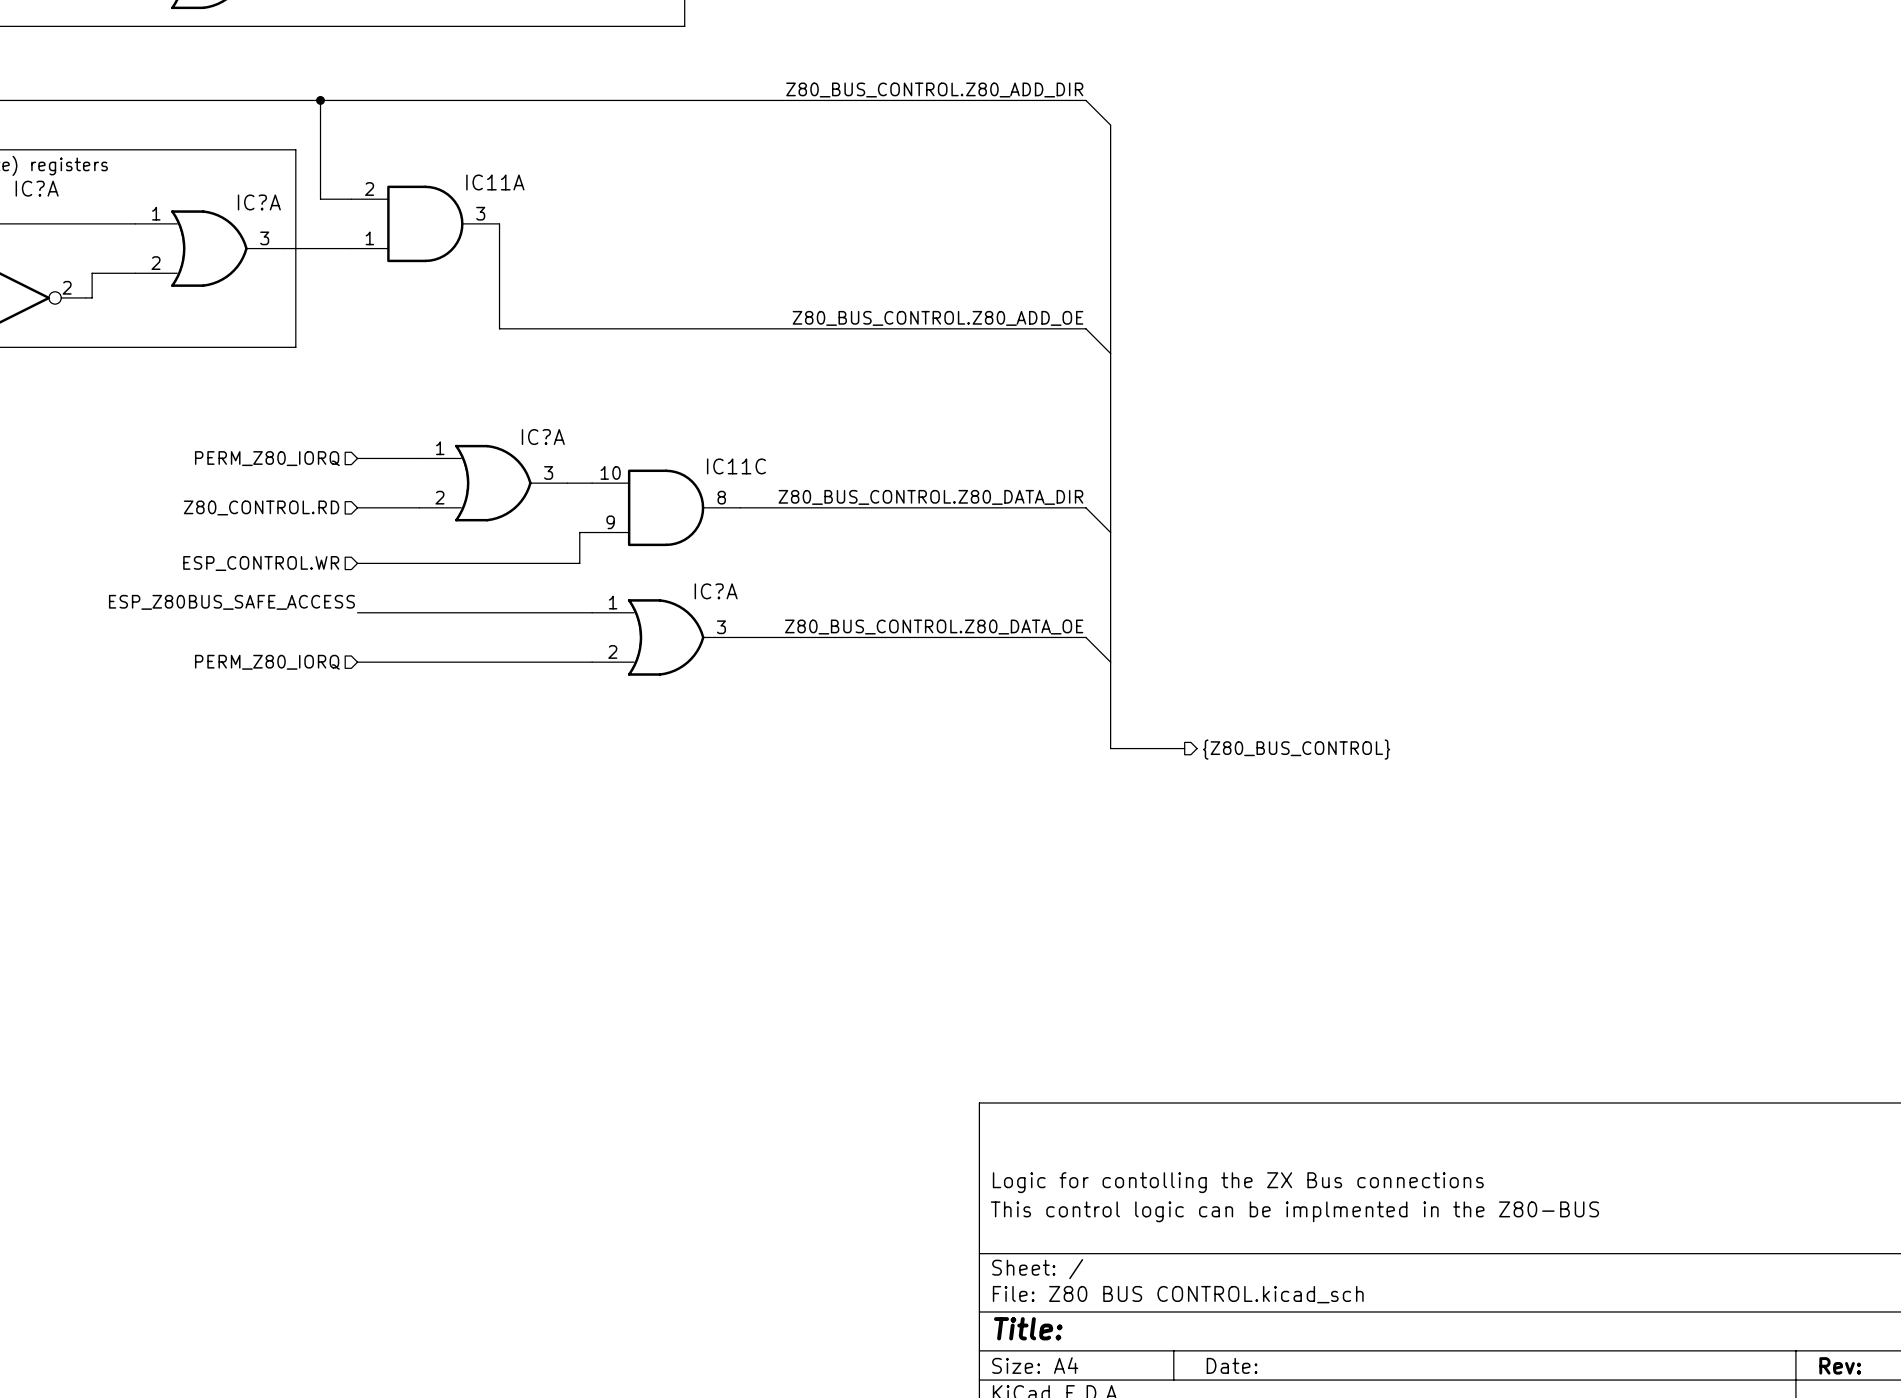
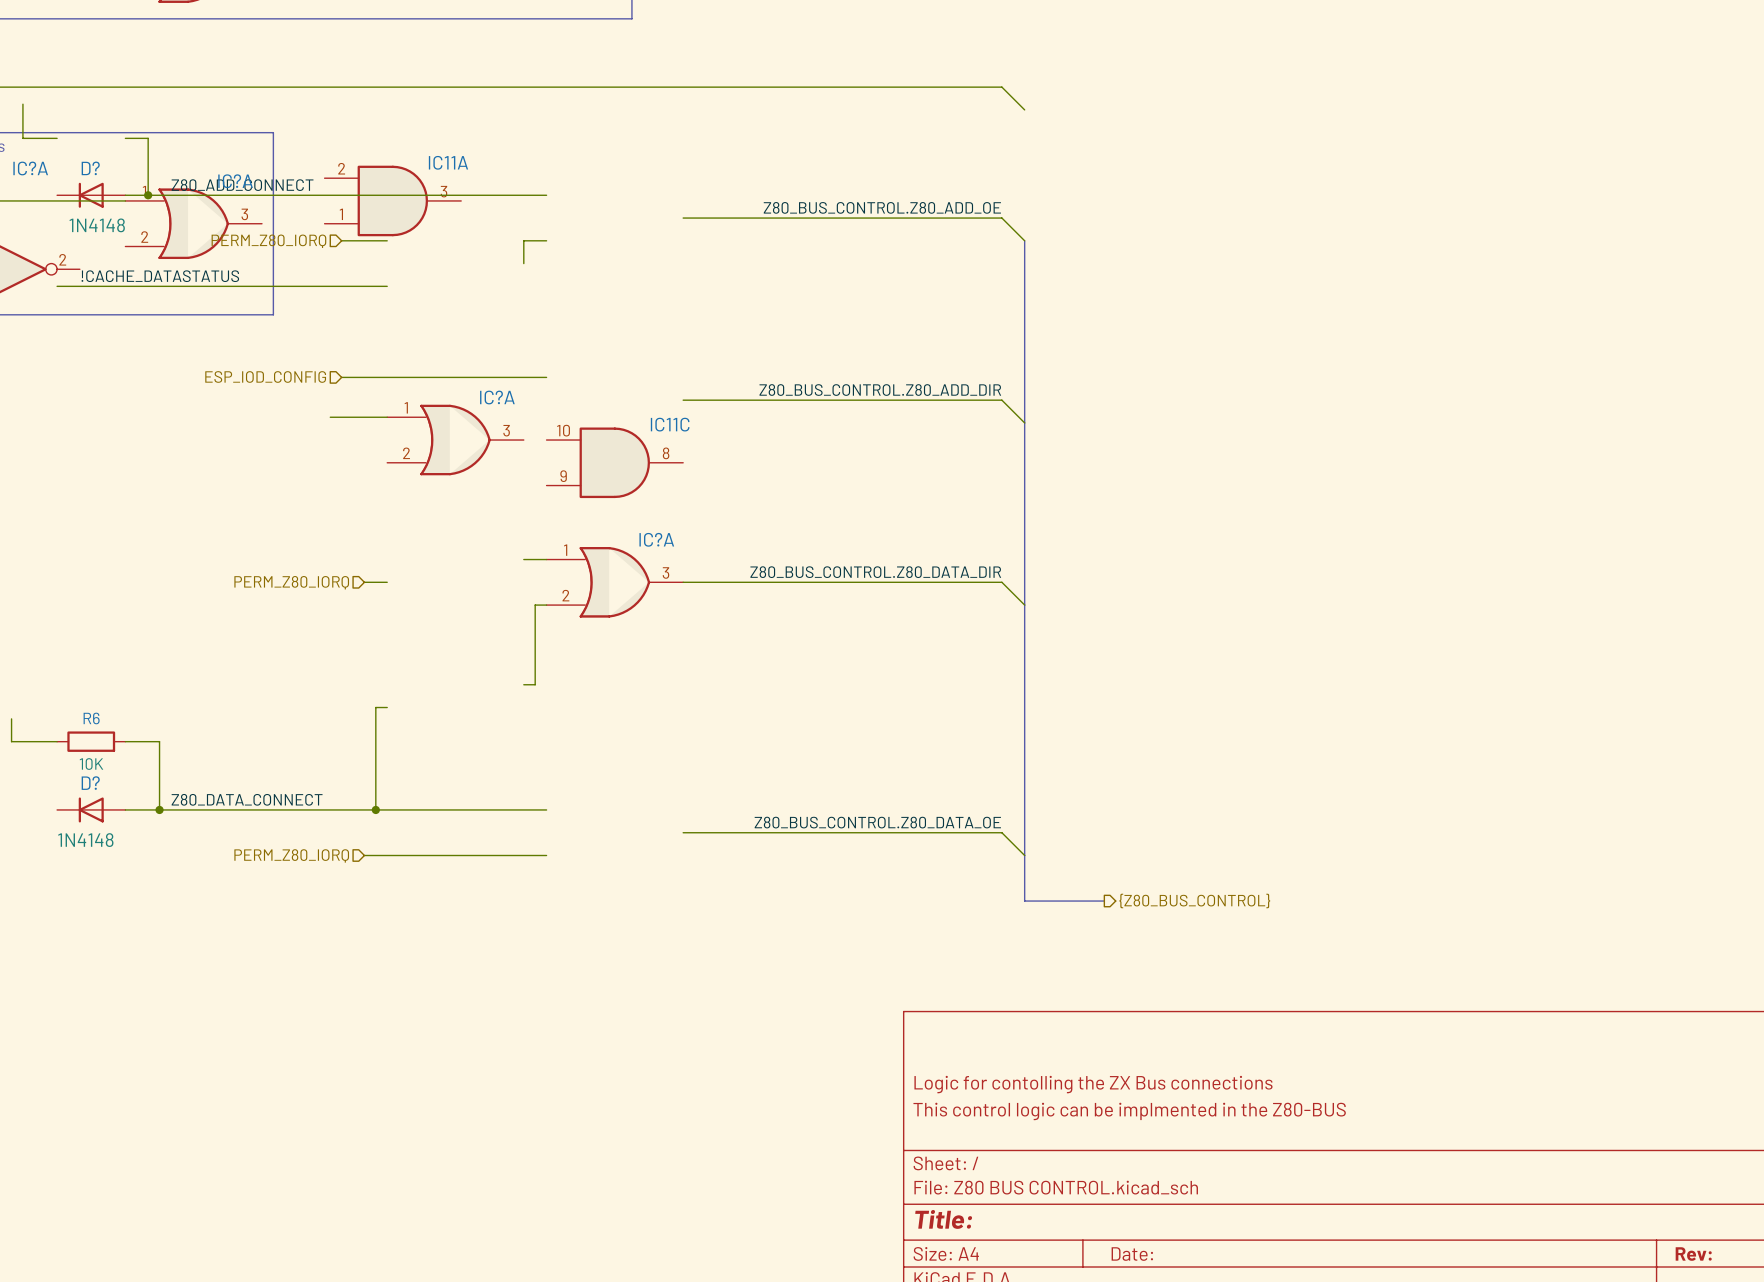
label: Z80_BUS_CONTROL.Z80_ADD_DIR (934, 90) -> none
wire: (320, 100) (320, 199) (351, 199) -> none
junction: (320, 100) -> none
wire: none -> (22, 104) (22, 138) (57, 138)
bus: (1110, 125) (1110, 267) -> none
wire: none -> (125, 138) (148, 138) (148, 195)
label: none -> Z80_ADD_CONNECT (242, 185)
D?: none -> 1N4148 (91, 195)
wire: none -> (125, 195) (546, 195)
junction: none -> (148, 195)
wire: (499, 223) (499, 328) (1085, 328) (1110, 353) -> none
wire: none -> (683, 218) (1001, 218) (1024, 240)
wire: (283, 248) (351, 248) -> none
hierarchical label: none -> PERM_Z80_IORQ (268, 241)
wire: none -> (341, 240) (387, 240)
wire: none -> (546, 240) (523, 240) (523, 263)
wire: (135, 273) (92, 273) (92, 297) (85, 297) -> none
label: none -> !CACHE_DATASTATUS (160, 276)
wire: none -> (57, 286) (387, 286)
label position: Z80_BUS_CONTROL.Z80_ADD_OE (937, 318) -> Z80_BUS_CONTROL.Z80_ADD_OE (882, 207)
hierarchical label: none -> ESP_IOD_CONFIG (265, 376)
wire: none -> (341, 377) (546, 377)
label: none -> Z80_BUS_CONTROL.Z80_ADD_DIR (880, 390)
hierarchical label: PERM_Z80_IORQ (267, 458) -> none
wire: (567, 483) (592, 483) -> (364, 582) (387, 582)
label: Z80_BUS_CONTROL.Z80_DATA_DIR (930, 497) -> none
hierarchical label: Z80_CONTROL.RD (261, 507) -> none
wire: (357, 507) (419, 507) -> none
wire: (740, 507) (1085, 507) (1110, 532) -> (683, 400) (1001, 400) (1024, 422)
wire: (592, 532) (579, 532) (579, 563) (357, 563) -> none
hierarchical label: ESP_CONTROL.WR (261, 563) -> none
label: ESP_Z80BUS_SAFE_ACCESS (231, 602) -> none
wire: (357, 612) (567, 612) -> none
label: Z80_BUS_CONTROL.Z80_DATA_OE (934, 627) -> Z80_BUS_CONTROL.Z80_DATA_DIR (875, 572)
hierarchical label position: PERM_Z80_IORQ (267, 662) -> PERM_Z80_IORQ (291, 582)
wire: (357, 662) (579, 662) -> (523, 684) (535, 684) (535, 605)
bus: (1110, 748) (1184, 748) -> (1024, 684) (1024, 901) (1104, 901)
hierarchical label position: {Z80_BUS_CONTROL} (1296, 749) -> {Z80_BUS_CONTROL} (1194, 900)
wire: none -> (387, 707) (375, 707) (375, 809)
wire: none -> (11, 718) (11, 741) (57, 741)
R6: none -> 10K (91, 741)
wire: none -> (125, 741) (159, 741) (159, 809)
label: none -> Z80_DATA_CONNECT (247, 799)
D?: none -> 1N4148 (91, 809)
wire: none -> (125, 809) (546, 809)
junction: none -> (159, 809)
junction: none -> (375, 809)
label: none -> Z80_BUS_CONTROL.Z80_DATA_OE (877, 822)
wire: none -> (683, 832) (1001, 832) (1024, 855)
hierarchical label: none -> PERM_Z80_IORQ (291, 855)
wire: none -> (364, 855) (546, 855)

